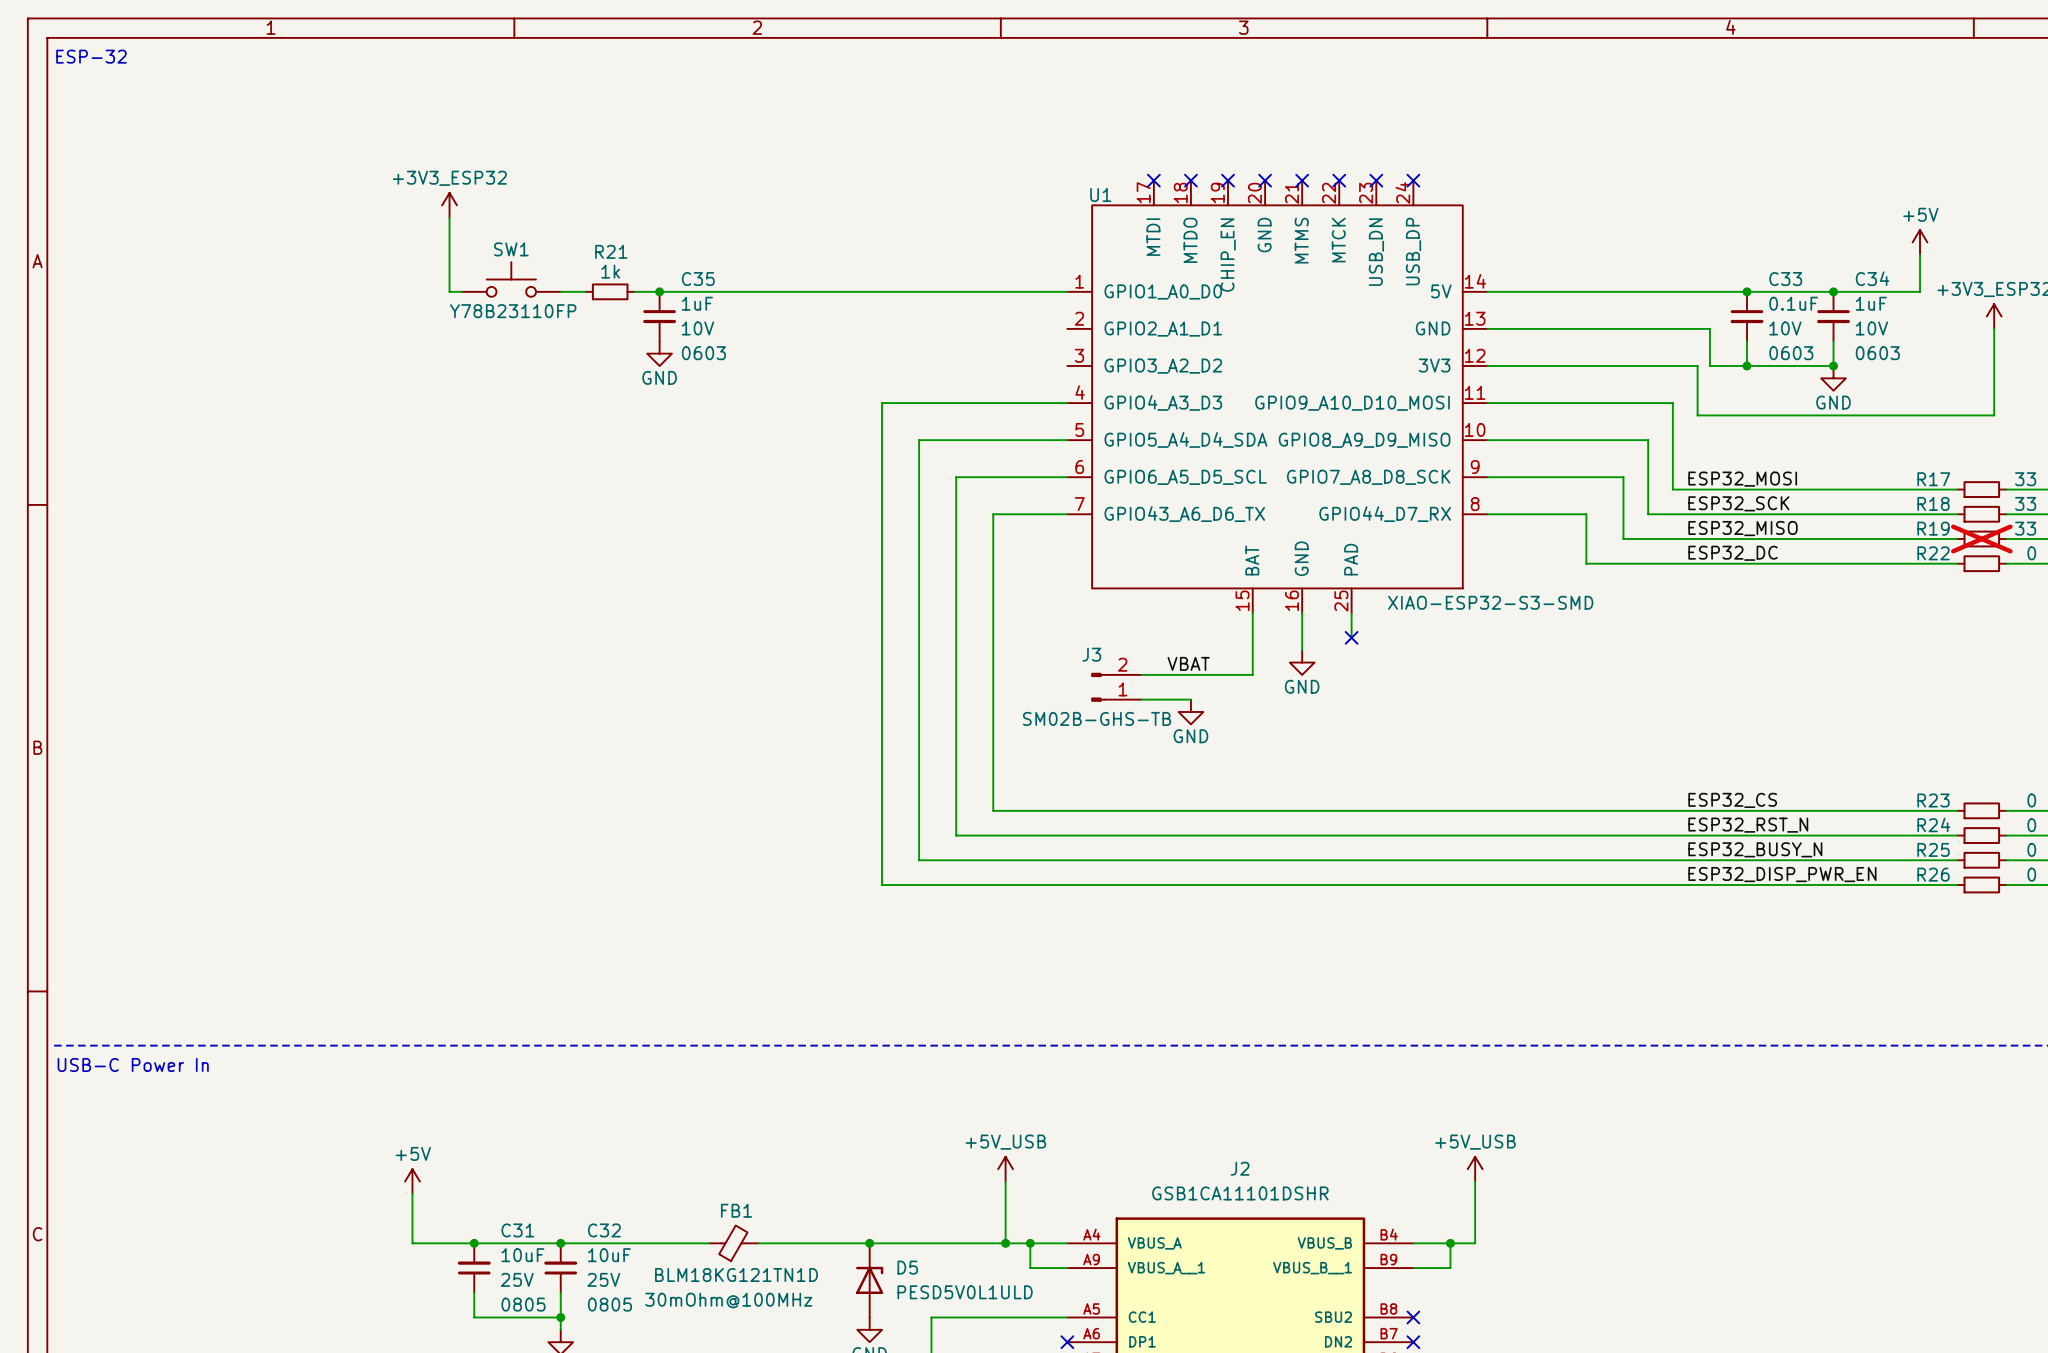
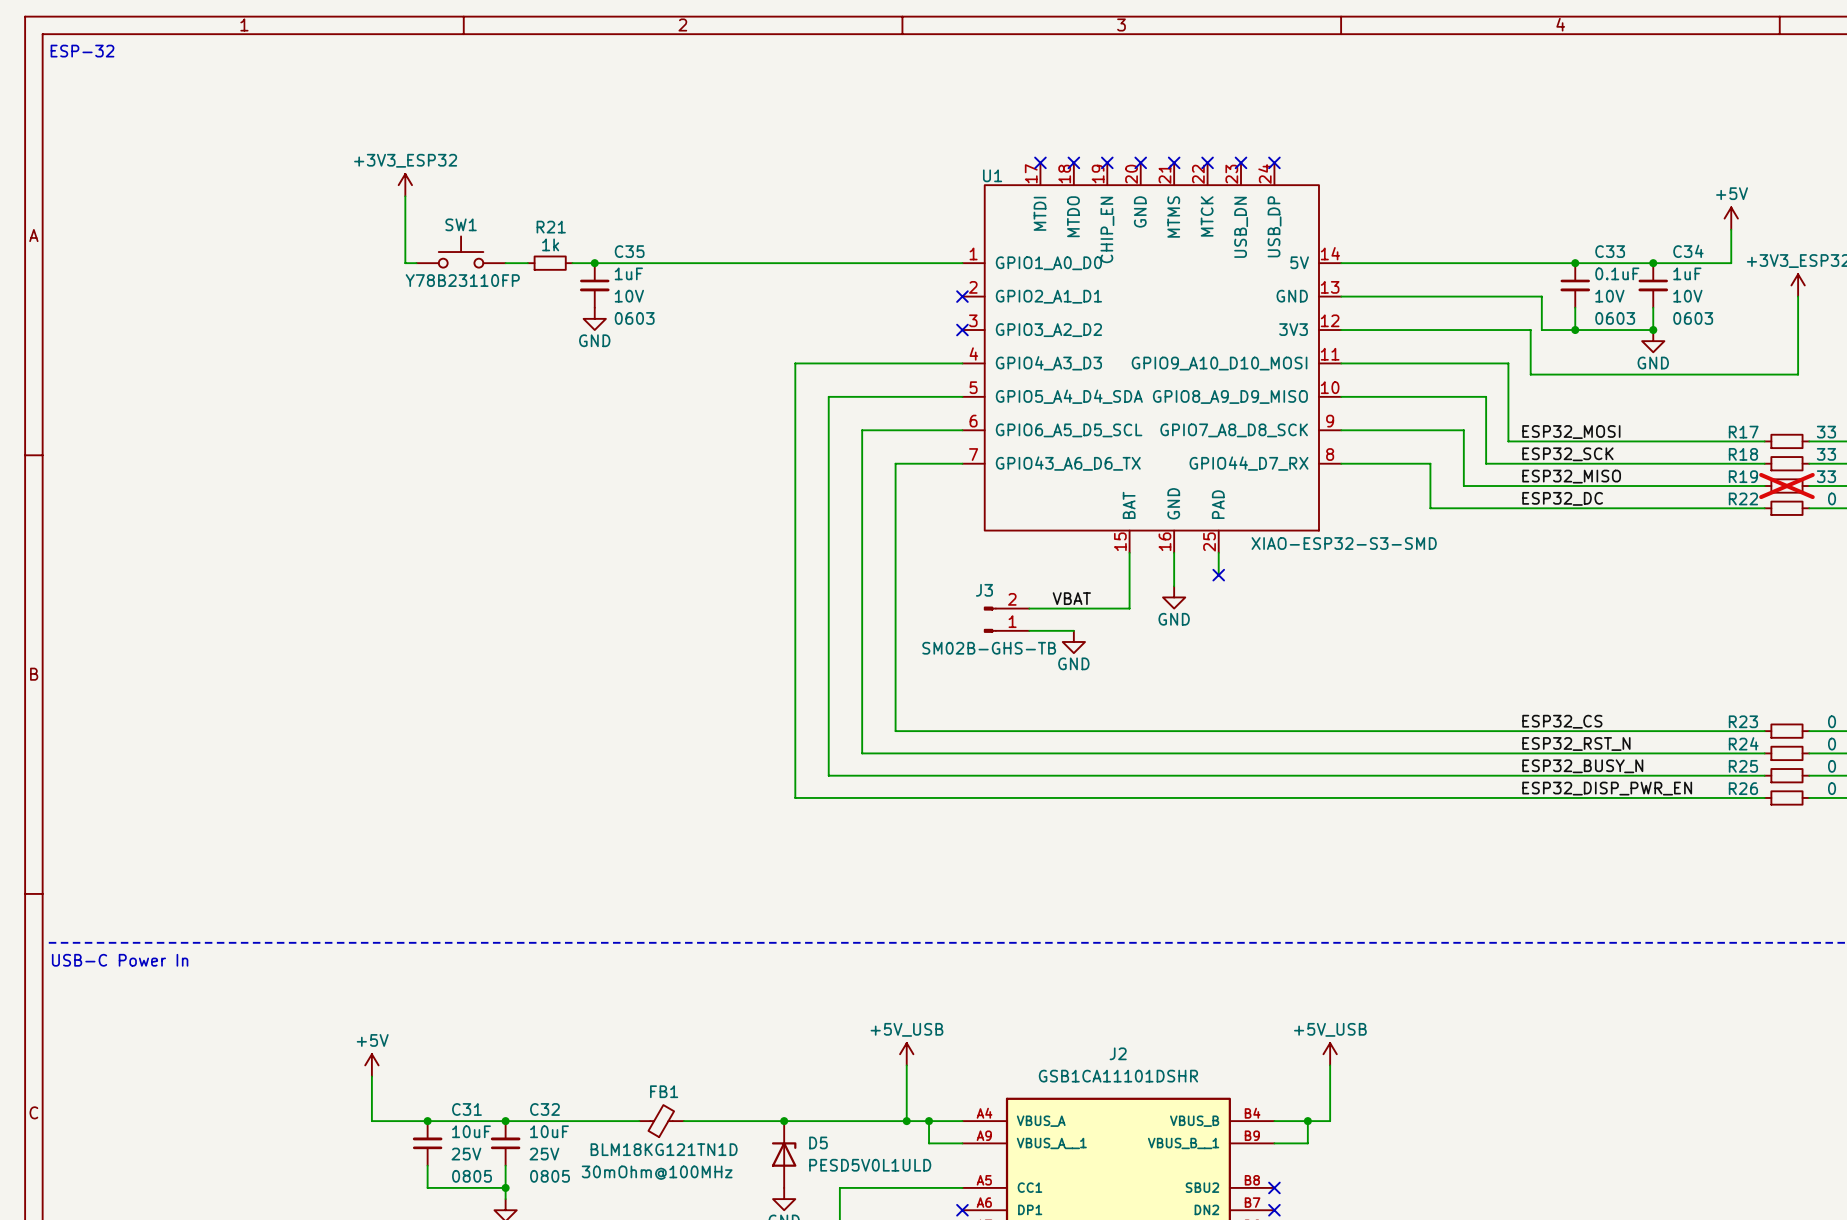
no-connect mark: none -> (962, 296)
no-connect mark: none -> (962, 330)

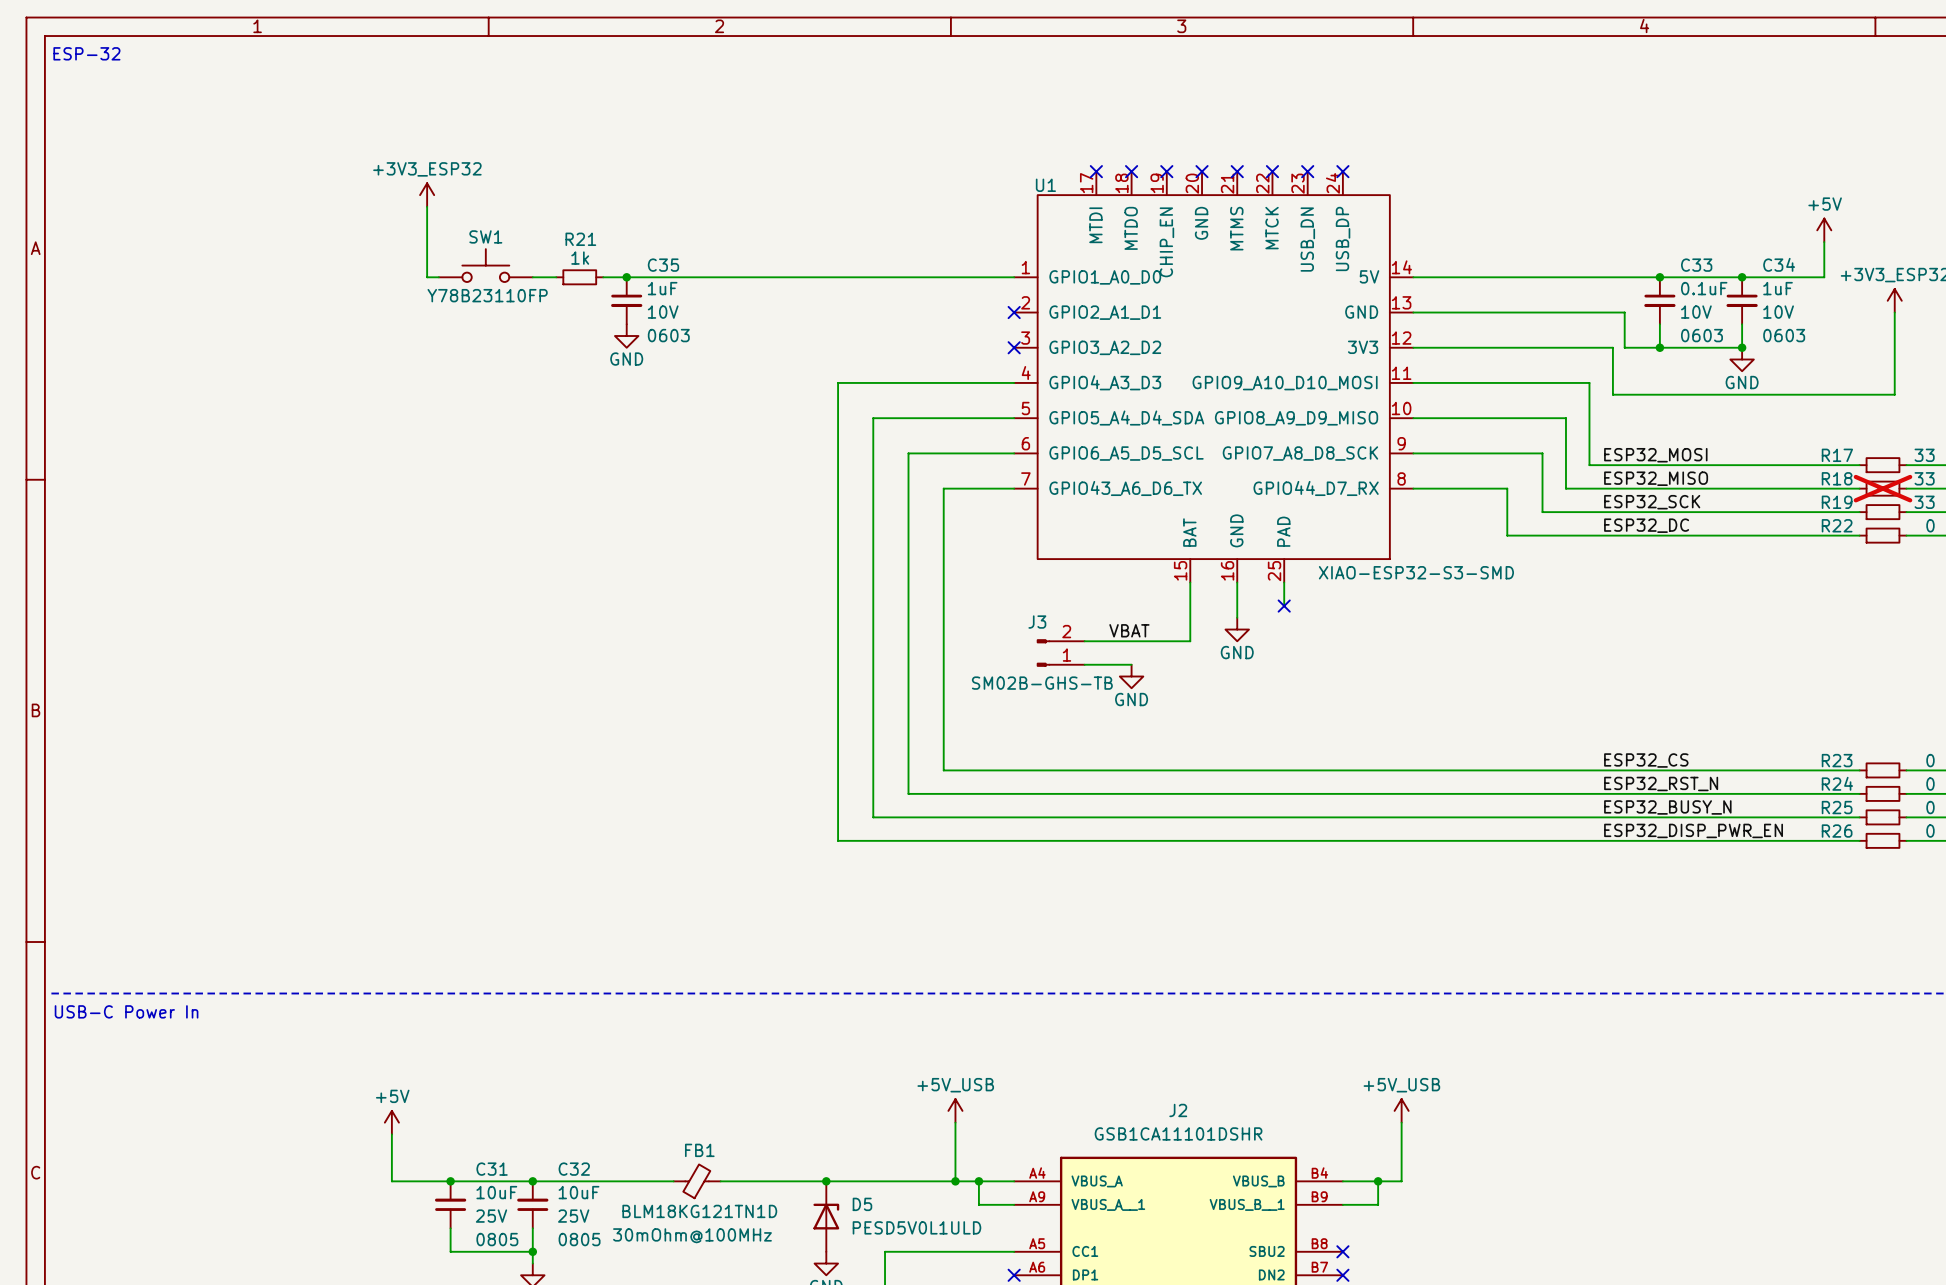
label: ESP32_SCK (1567, 454) -> ESP32_MISO (1656, 478)
R18 do-not-place cross: none -> (1882, 488)
label: ESP32_MISO (1571, 476) -> ESP32_SCK (1652, 502)
R19 do-not-place cross: (1786, 486) -> none

